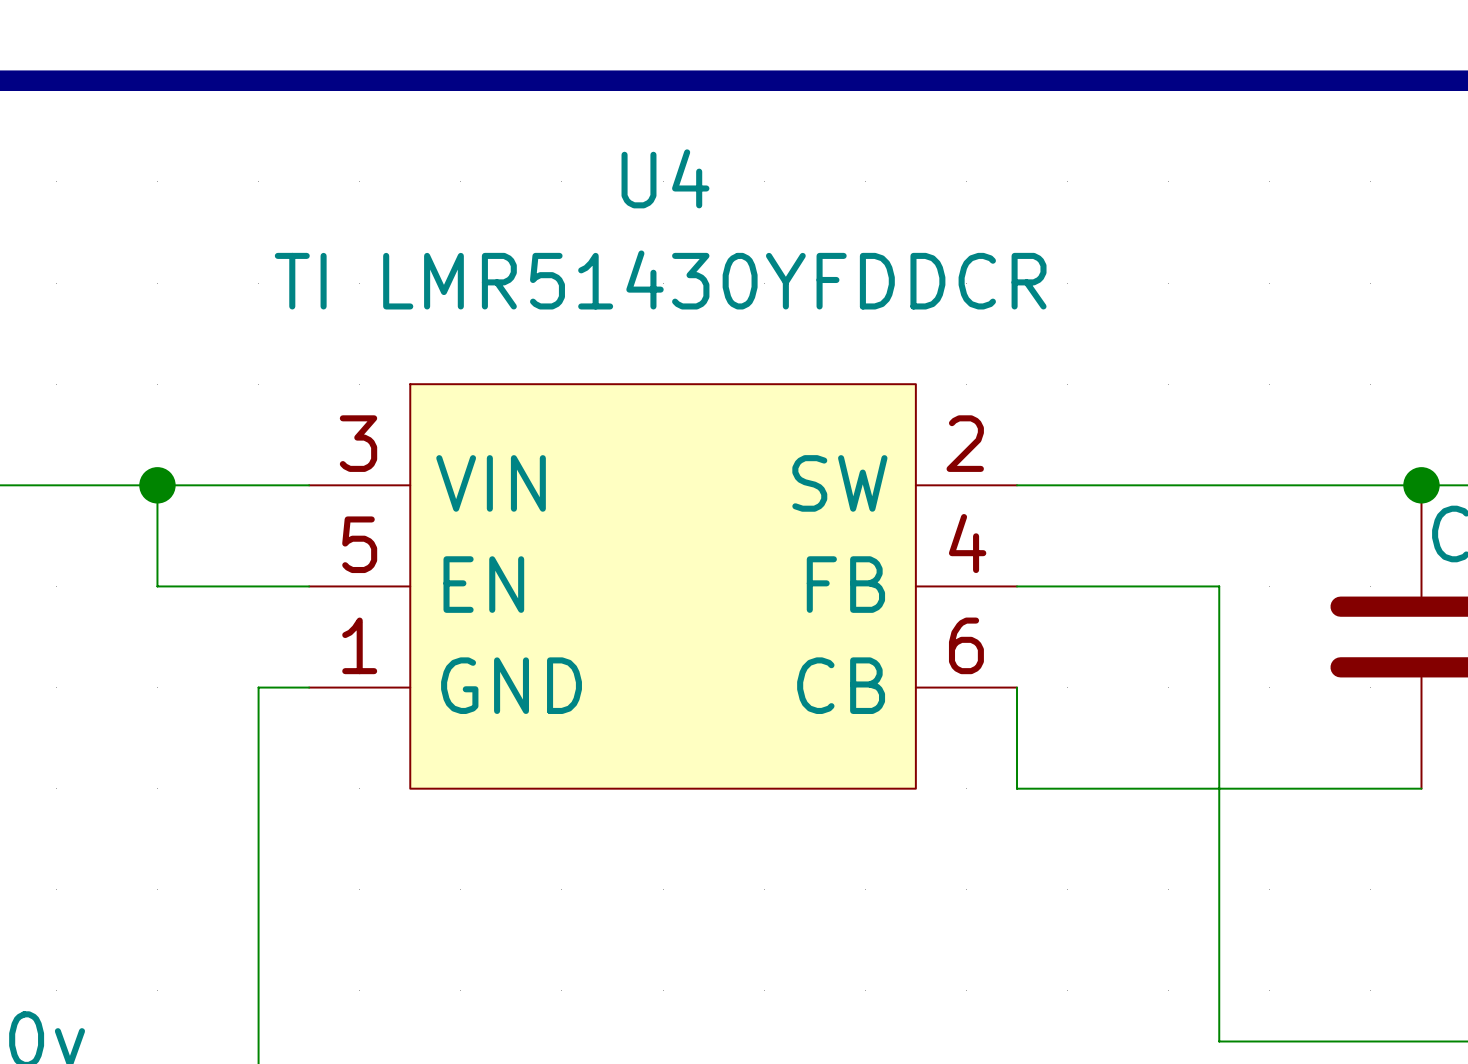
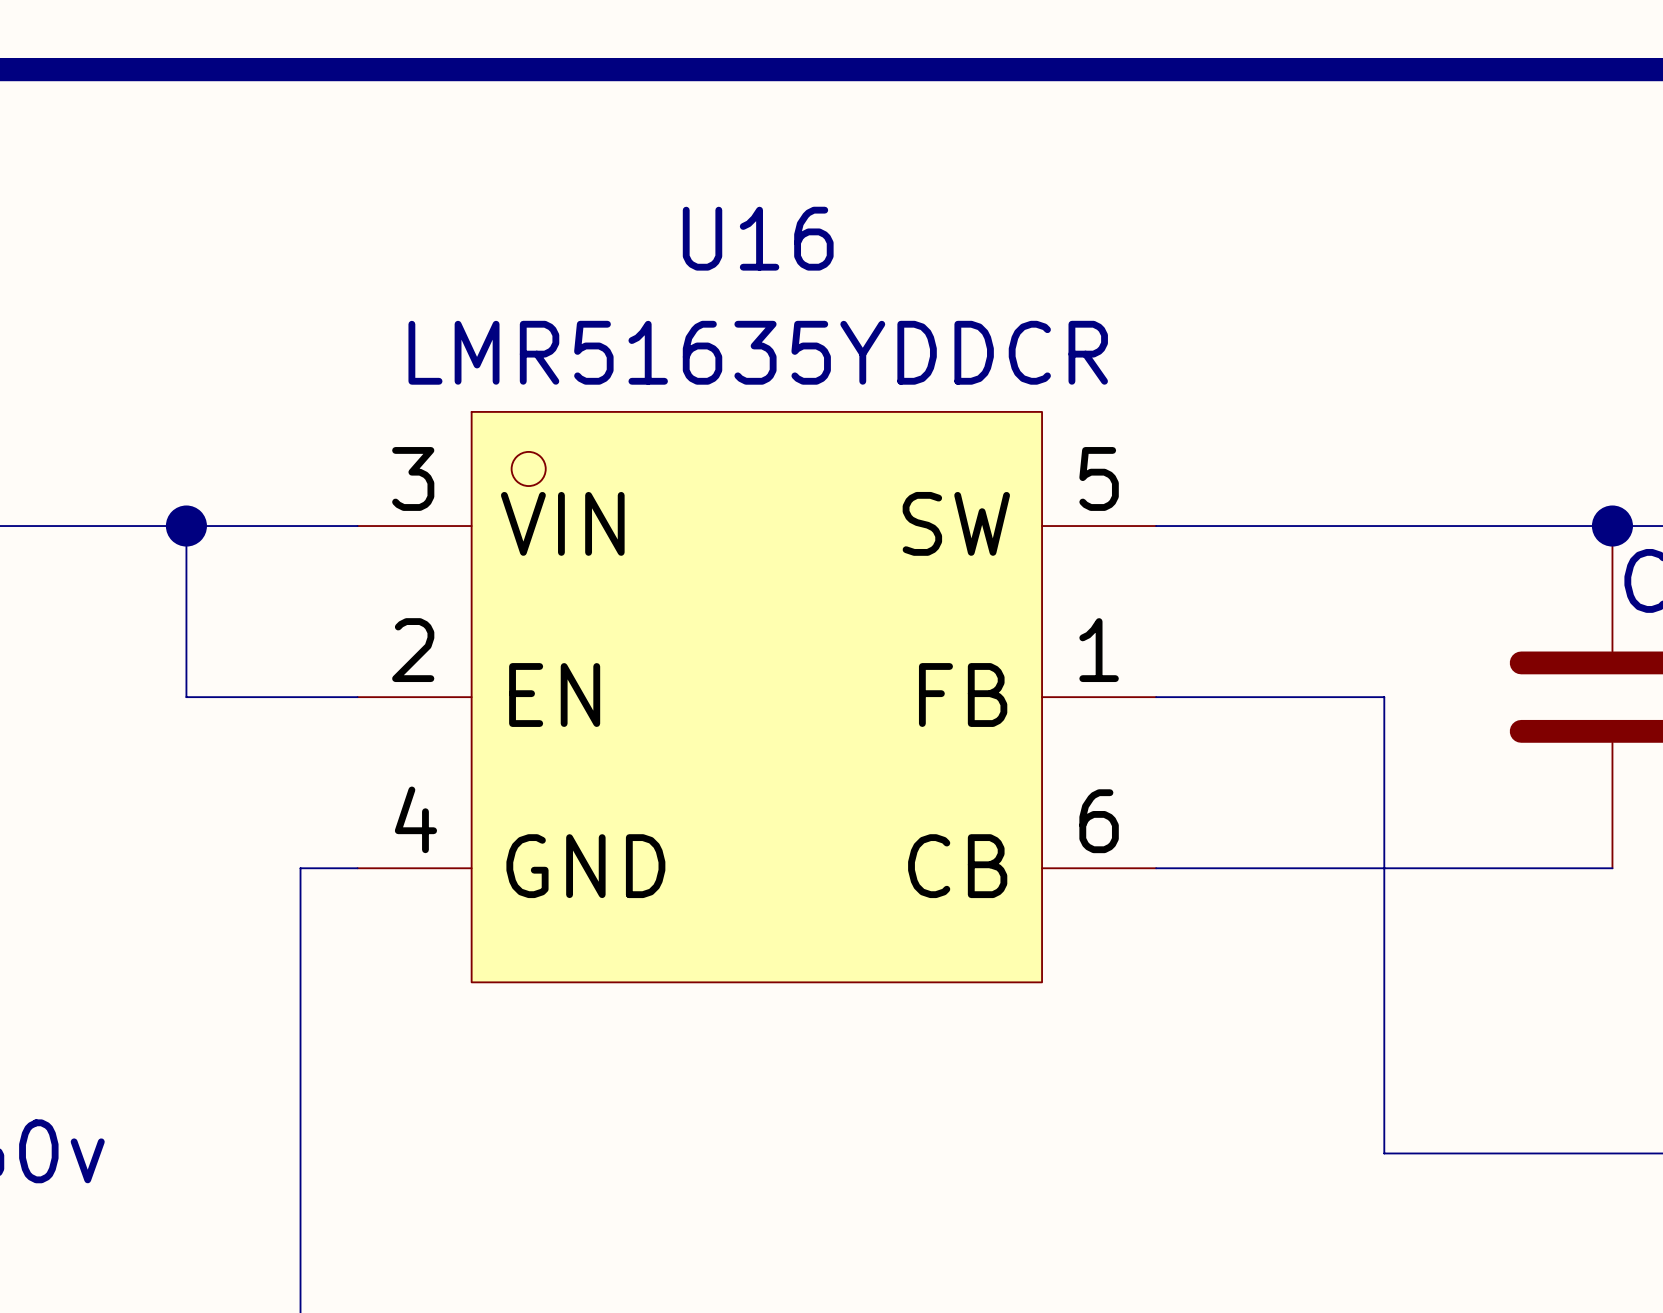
wire: (157, 586) (309, 586) -> (186, 640) (186, 697) (357, 697)
U4: TI LMR51430YFDDCR (663, 586) -> none
wire: (1017, 586) (1219, 586) (1219, 637) -> (1156, 697) (1384, 697)
U16: none -> LMR51635YDDCR (756, 697)
wire: (309, 687) (258, 687) (258, 788) -> (357, 868) (300, 868)
wire: (1017, 687) (1017, 788) -> none

